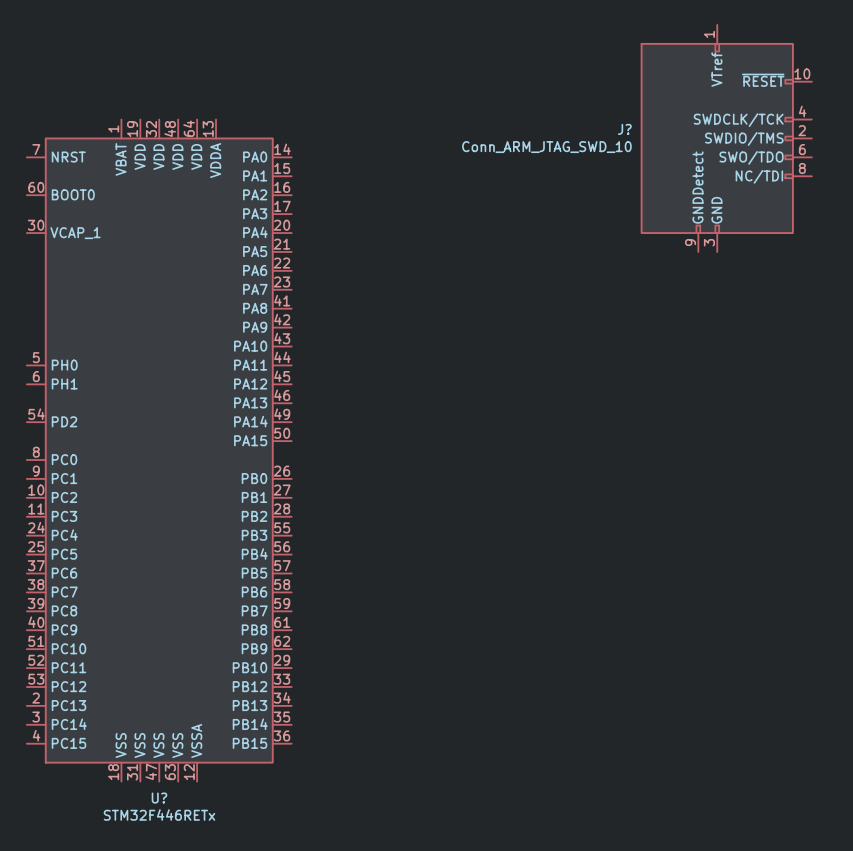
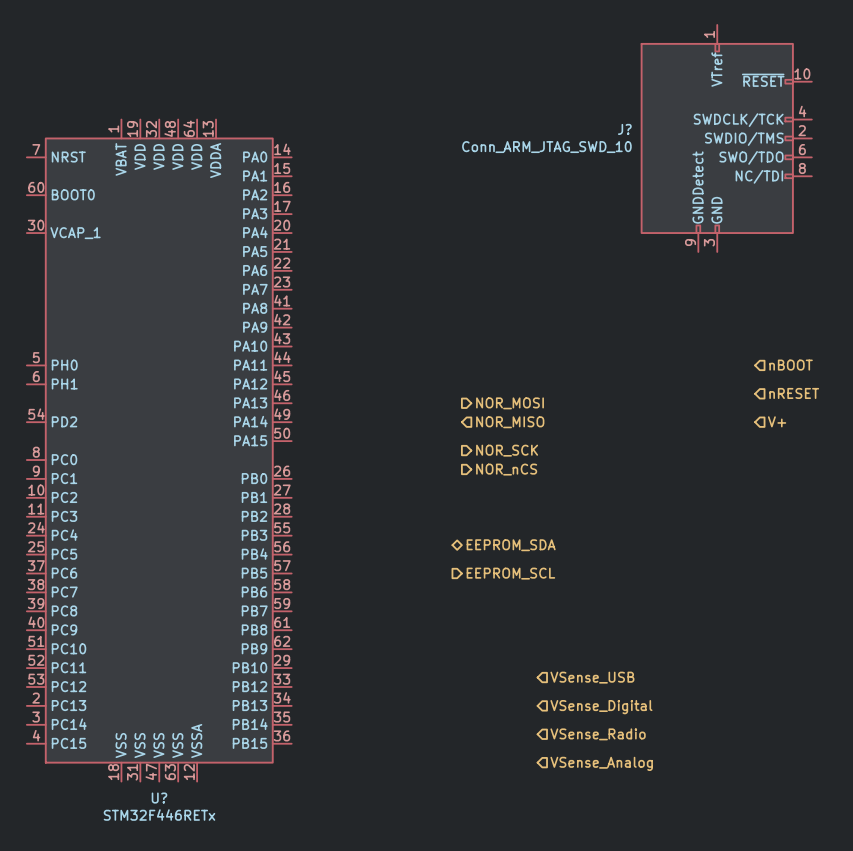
hierarchical label: none -> nBOOT (791, 365)
hierarchical label: none -> nRESET (794, 393)
hierarchical label: none -> NOR_MOSI (510, 403)
hierarchical label: none -> V+ (777, 421)
hierarchical label: none -> NOR_MISO (510, 422)
hierarchical label: none -> NOR_SCK (507, 450)
hierarchical label: none -> NOR_nCS (506, 469)
hierarchical label: none -> EEPROM_SDA (511, 545)
hierarchical label: none -> EEPROM_SCL (510, 573)
hierarchical label: none -> VSense_USB (592, 677)
hierarchical label: none -> VSense_Digital (601, 707)
hierarchical label: none -> VSense_Radio (598, 734)
hierarchical label: none -> VSense_Analog (601, 763)

